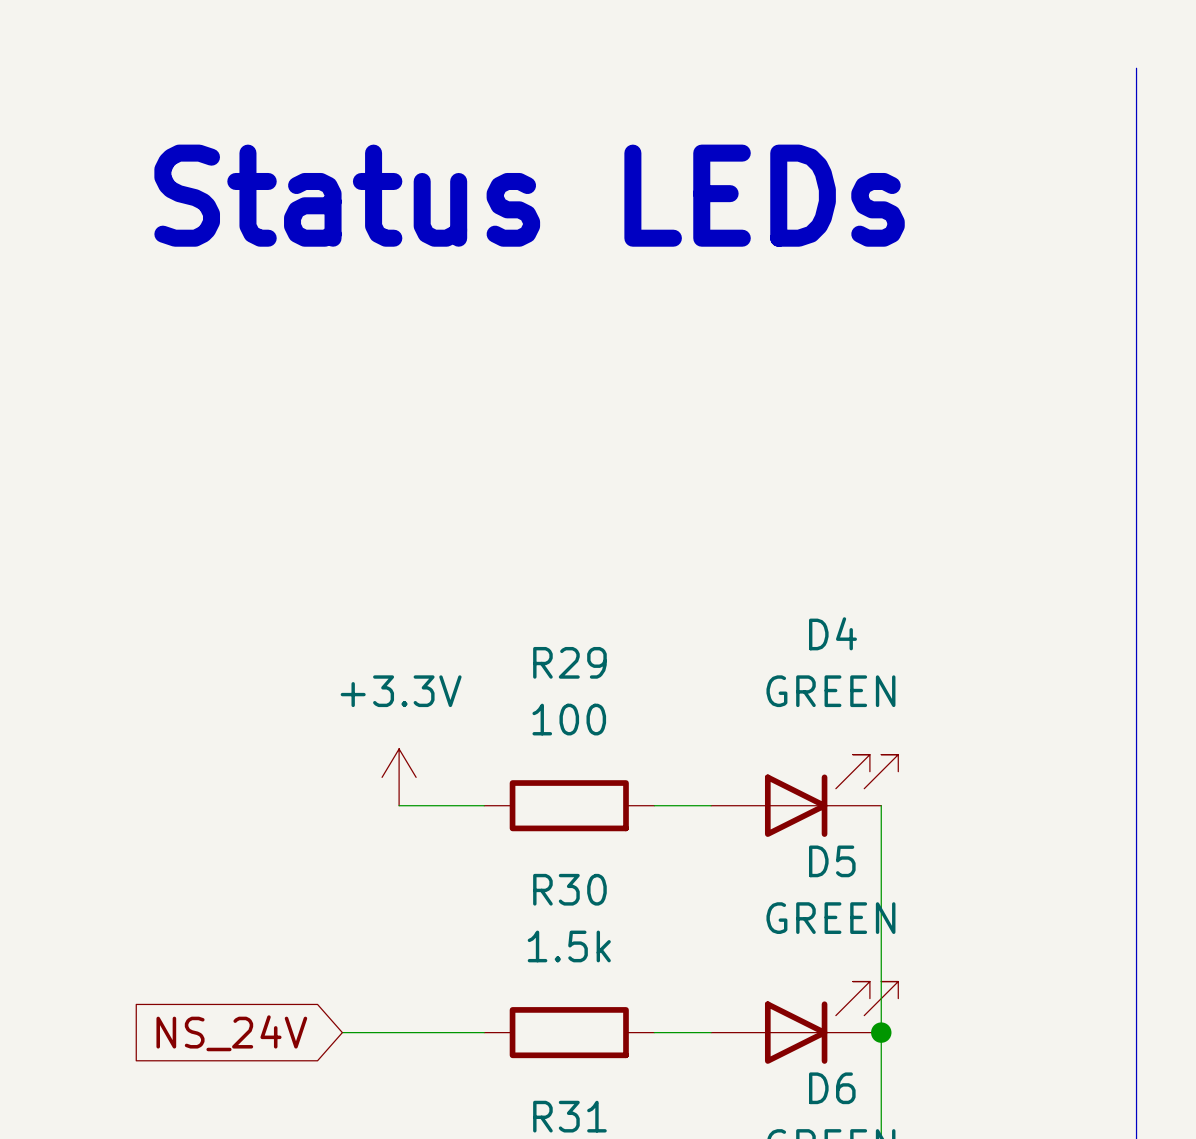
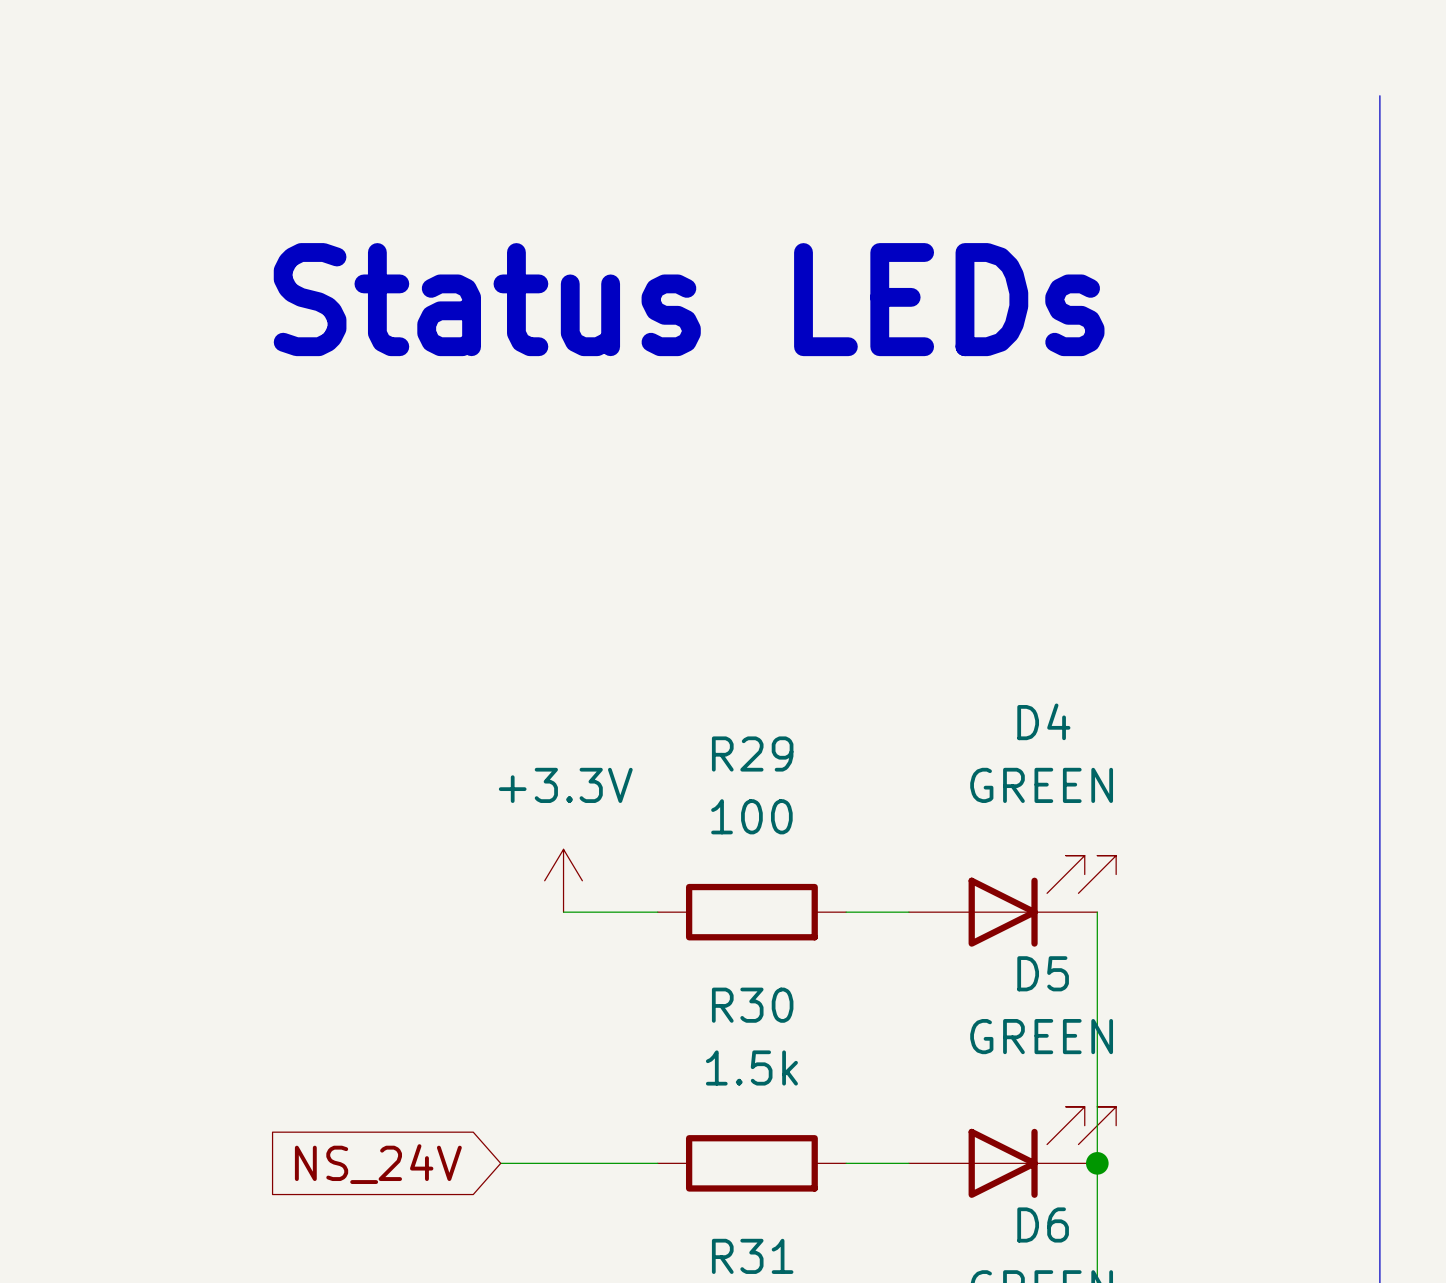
text position: Status LEDs (529, 195) -> Status LEDs (689, 299)

